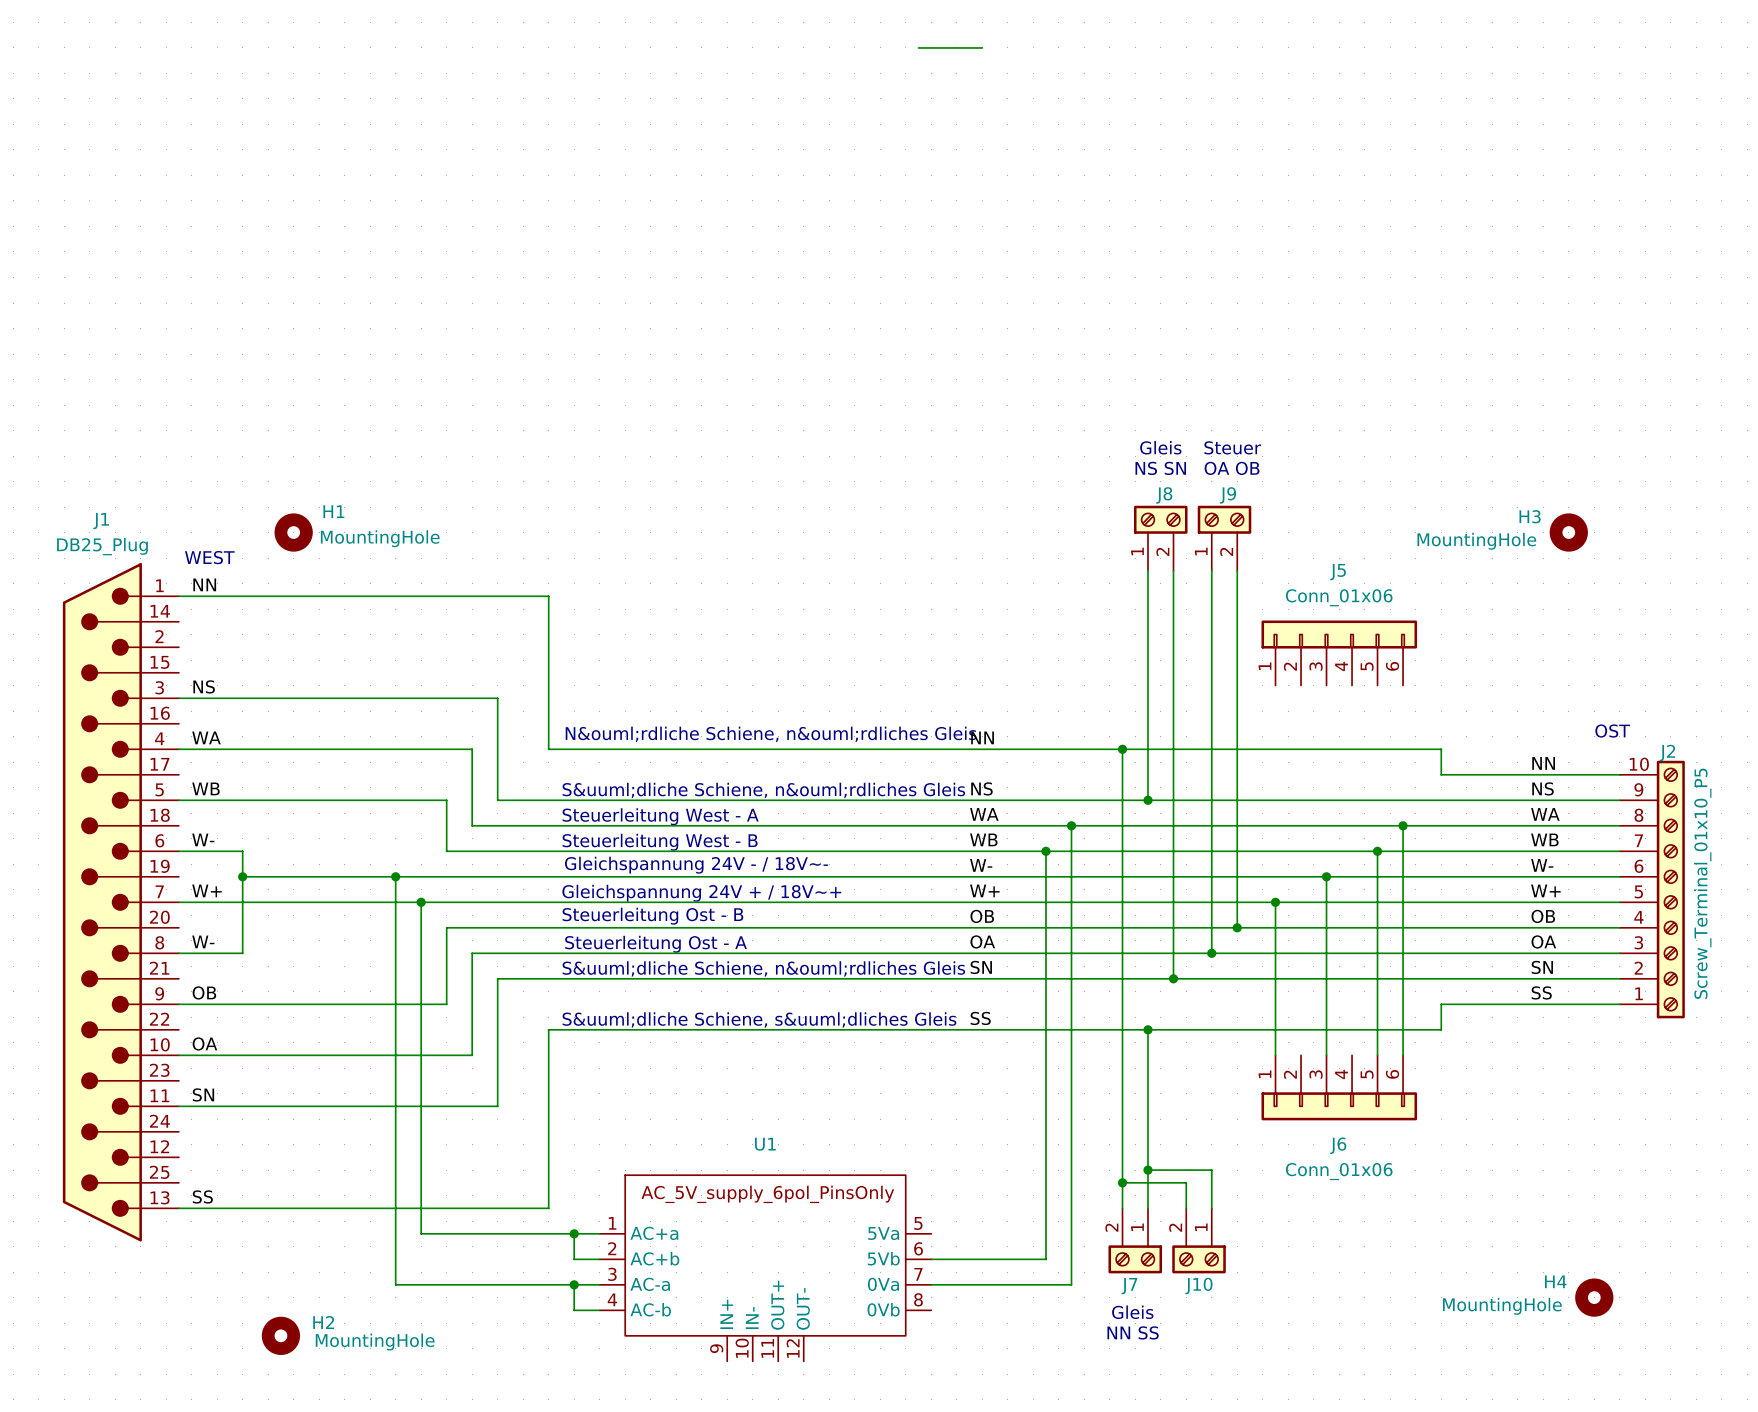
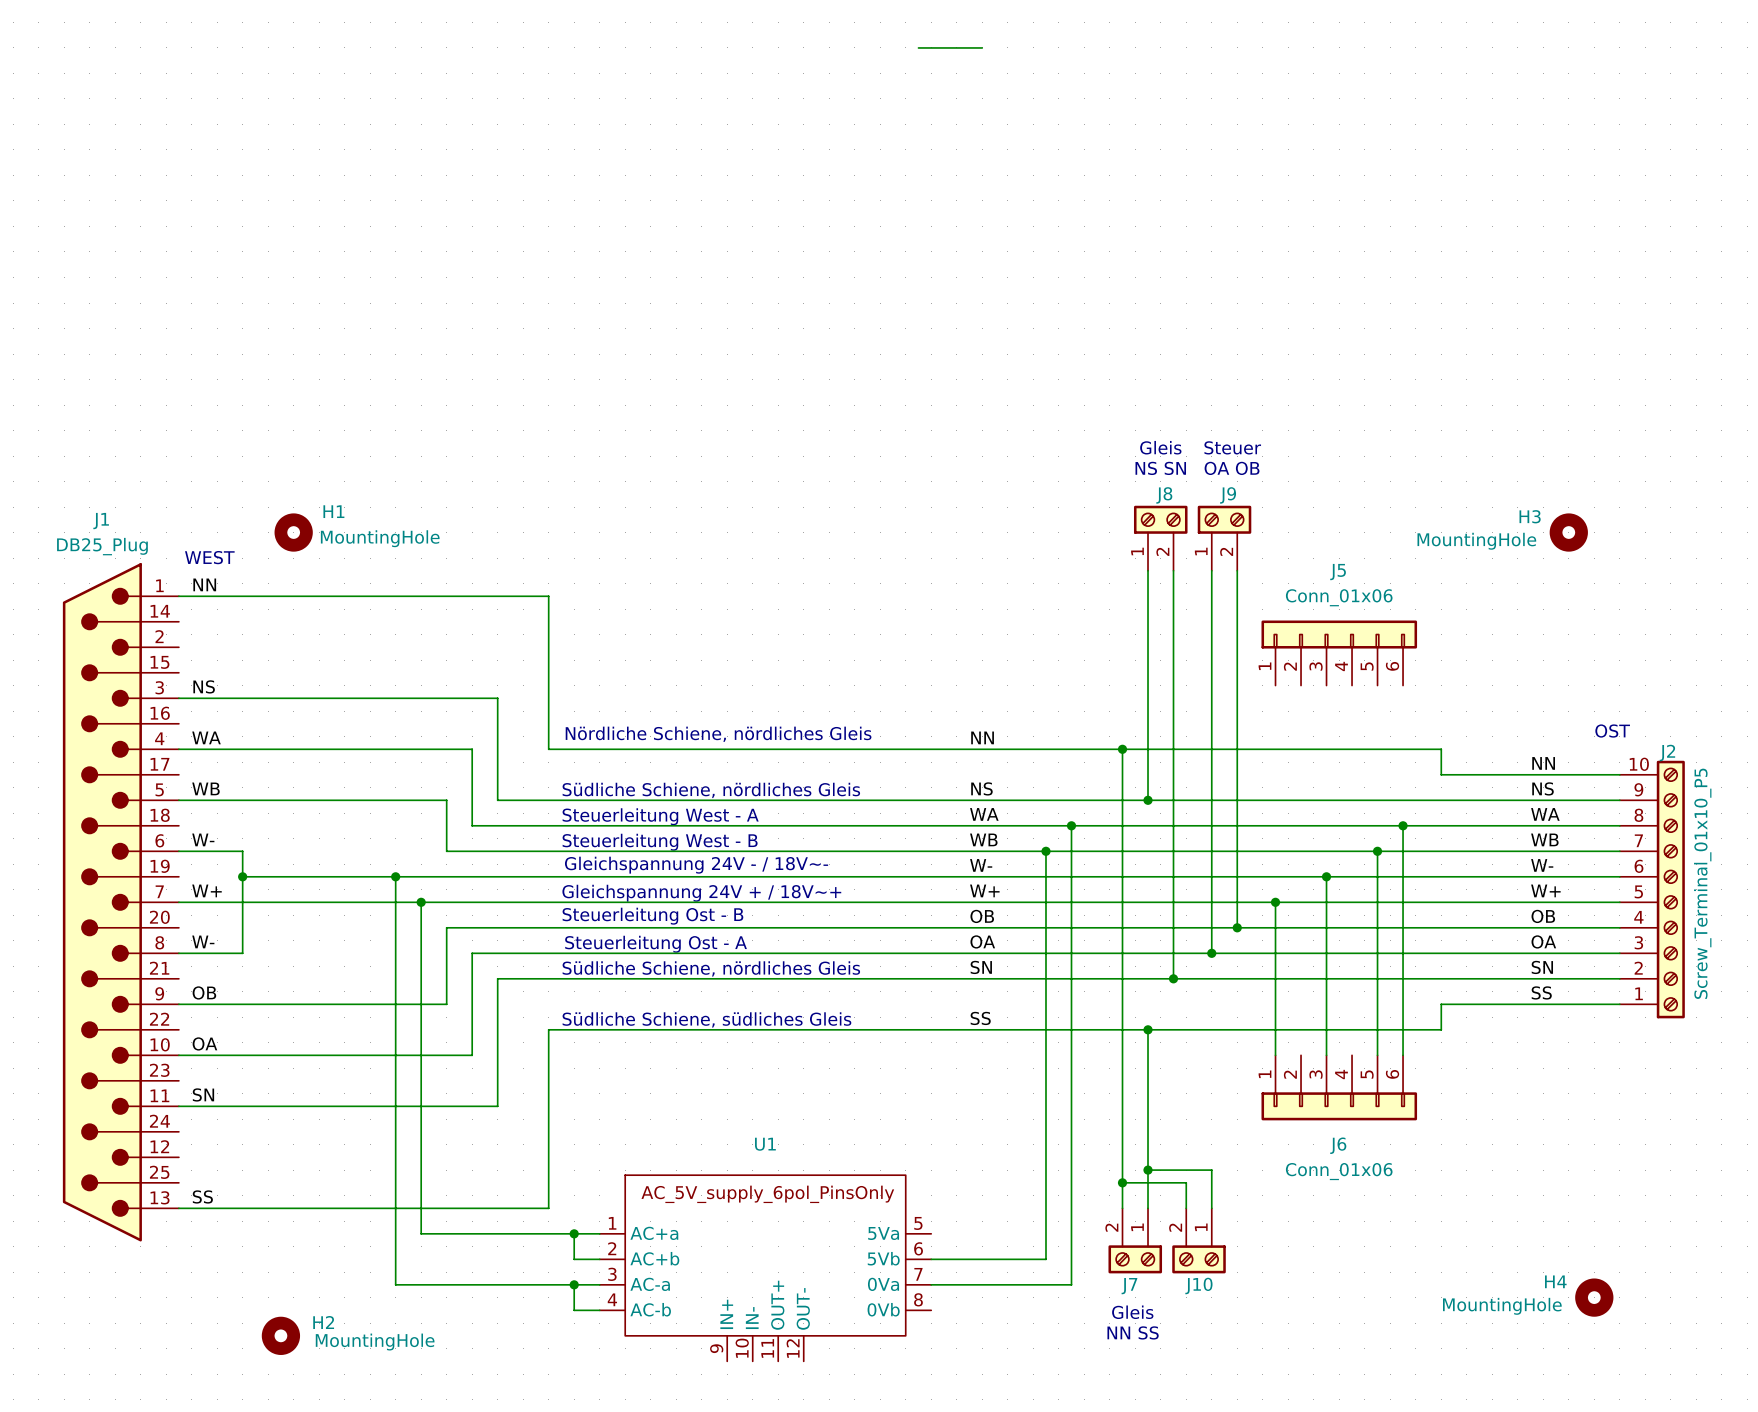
text: N&ouml;rdliche Schiene, n&ouml;rdliches Gleis (771, 734) -> Nördliche Schiene, nördliches Gleis (718, 734)
text: S&uuml;dliche Schiene, n&ouml;rdliches Gleis (763, 790) -> Südliche Schiene, nördliches Gleis (711, 790)
text: S&uuml;dliche Schiene, n&ouml;rdliches Gleis (763, 968) -> Südliche Schiene, nördliches Gleis (711, 968)
text: S&uuml;dliche Schiene, s&uuml;dliches Gleis (759, 1019) -> Südliche Schiene, südliches Gleis (706, 1019)

